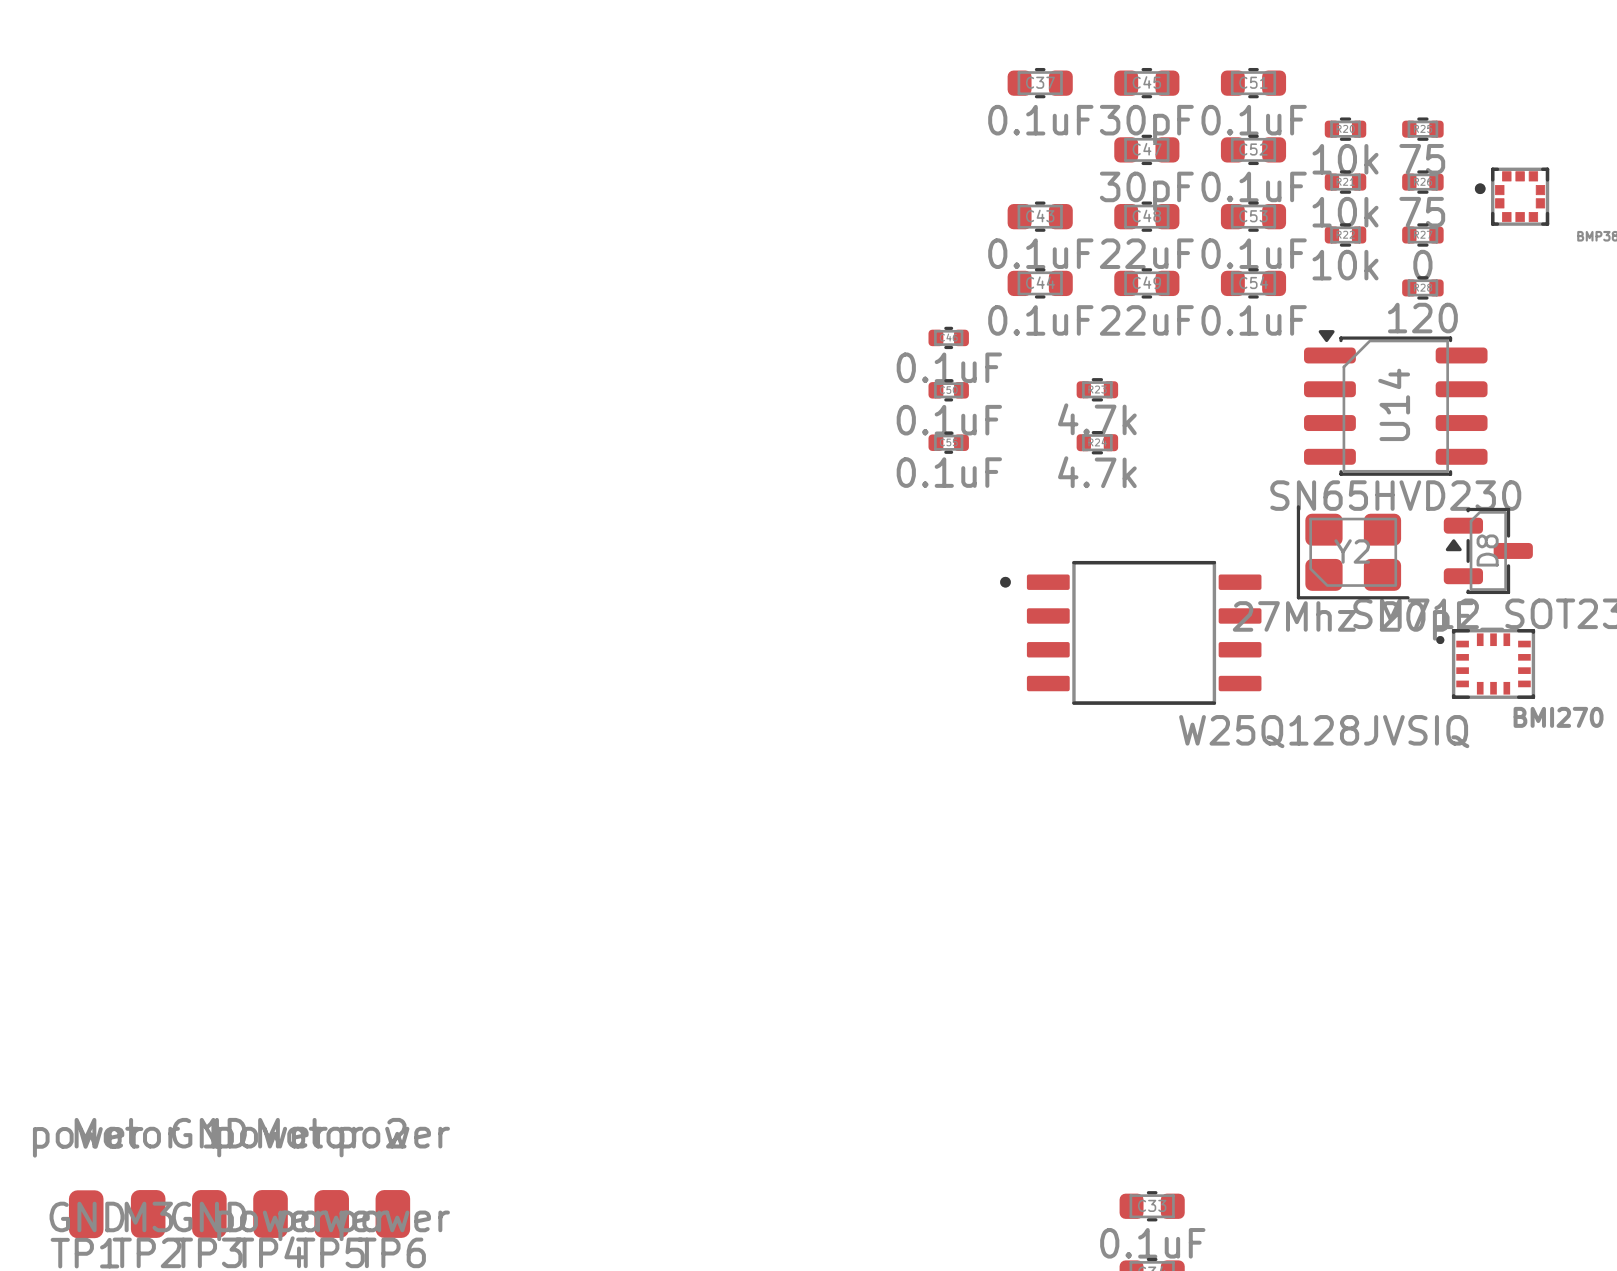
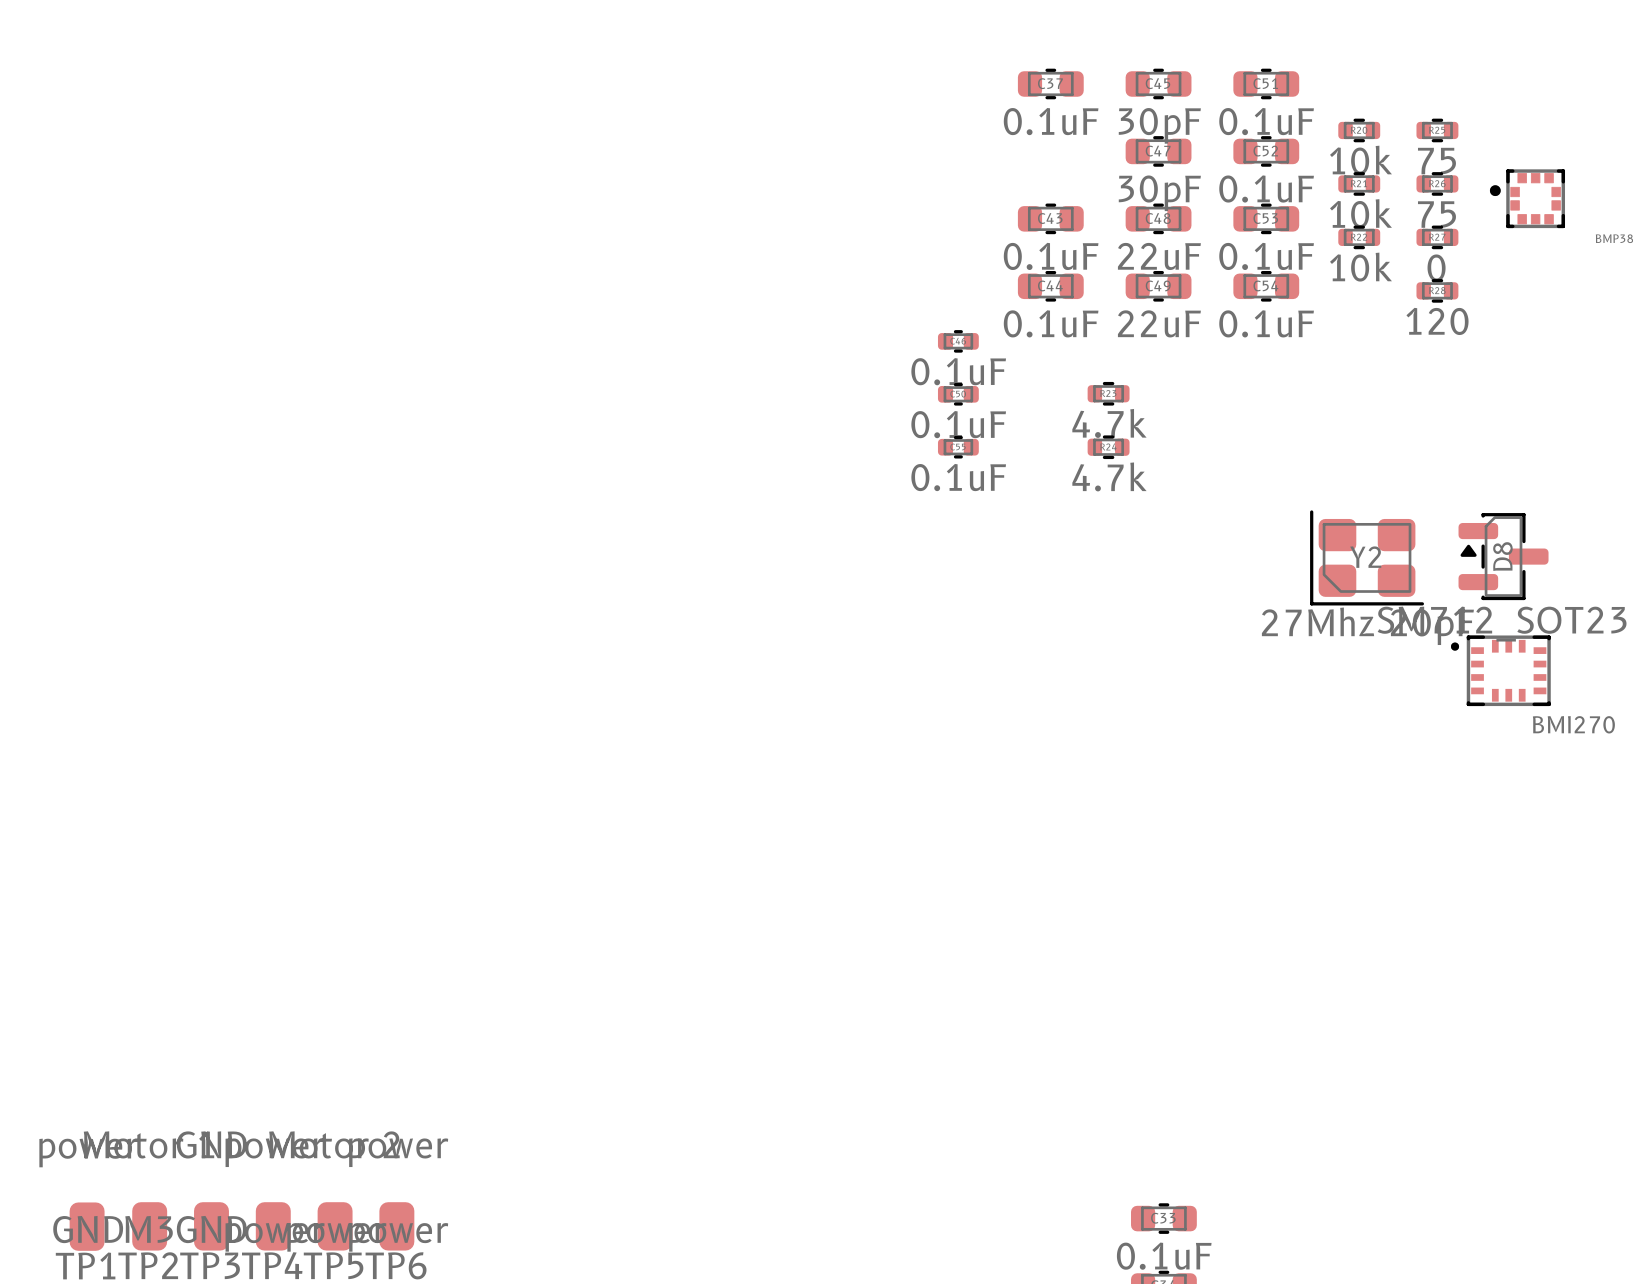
U14: SN65HVD230 (1395, 402) -> none
part: W25Q128JVSIQ (1130, 632) -> none

